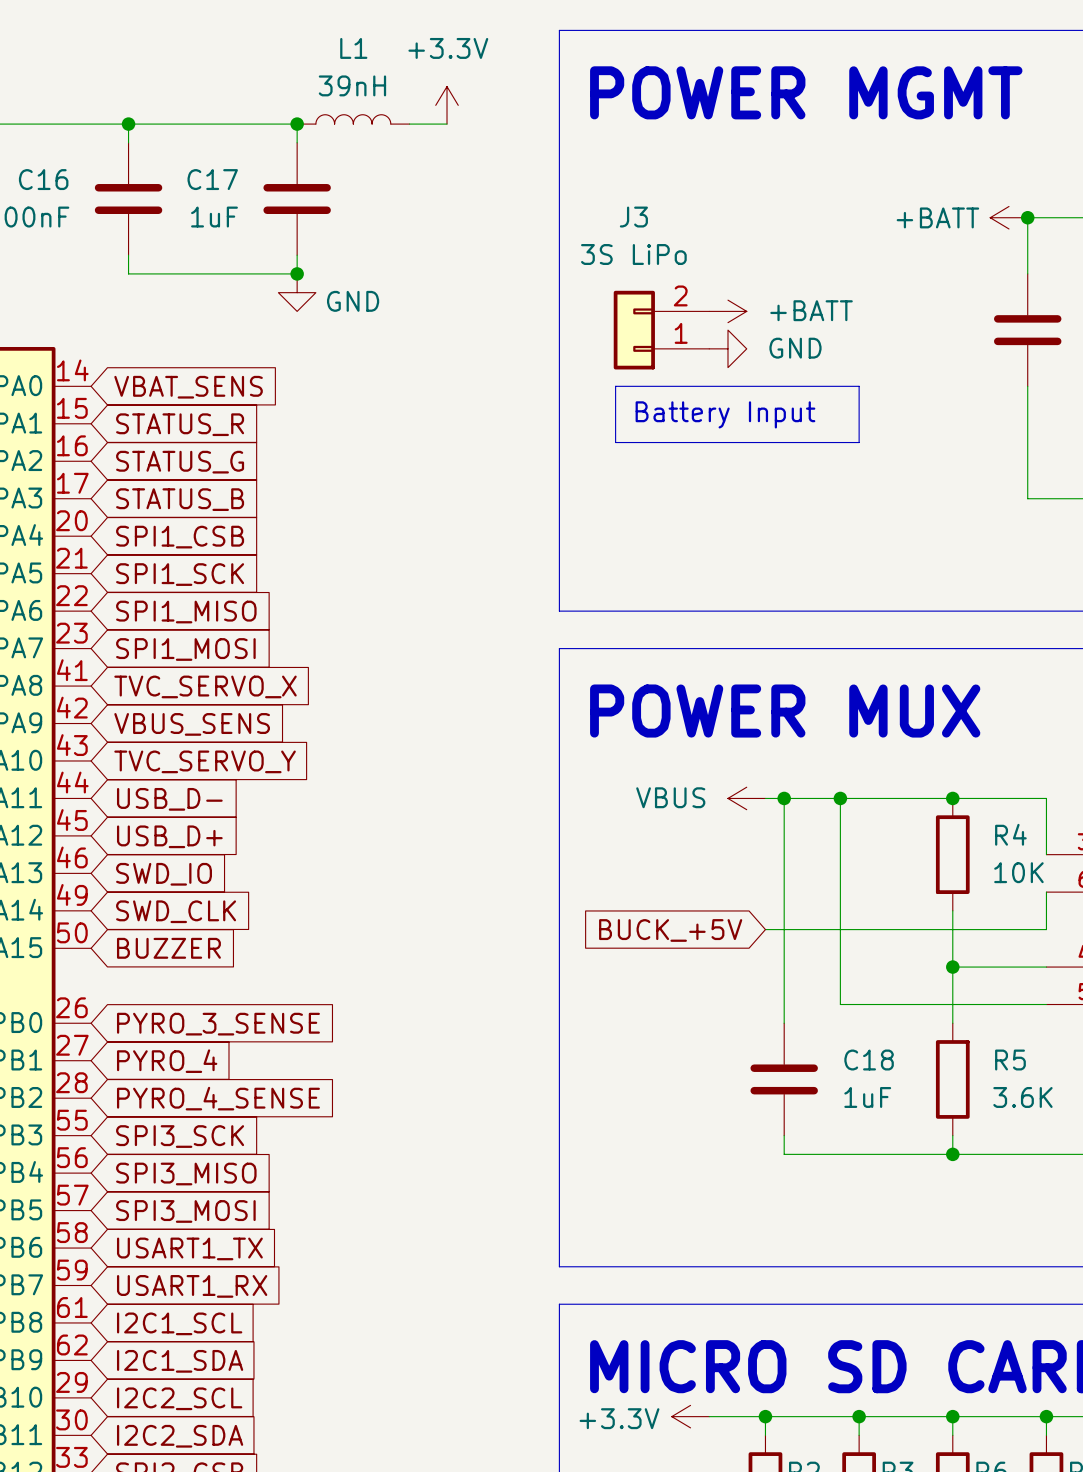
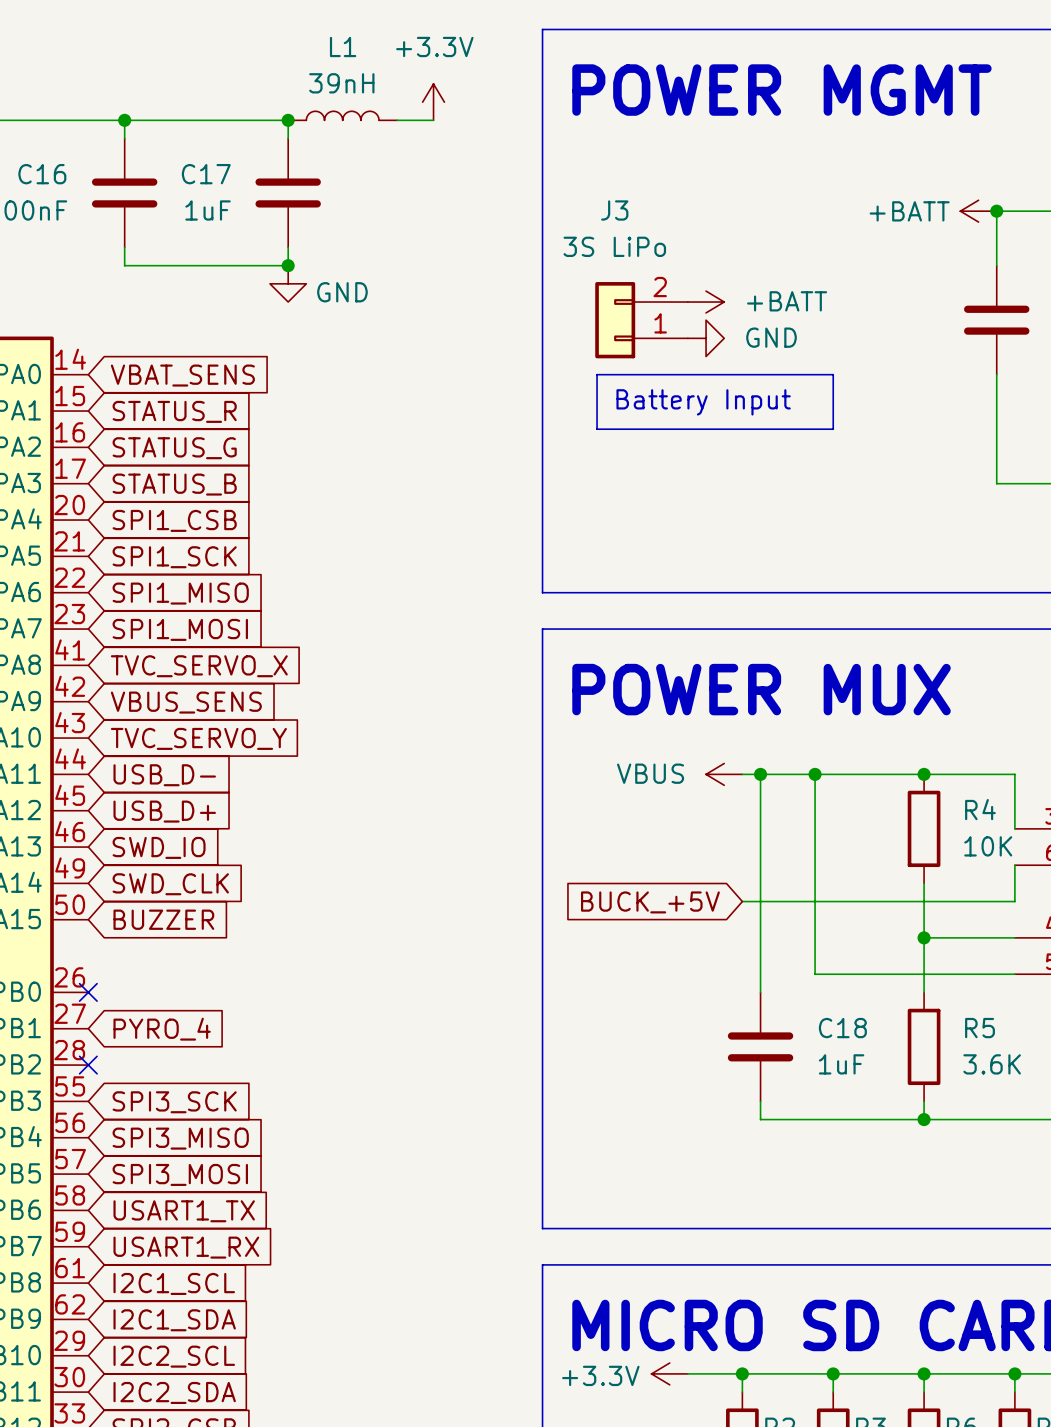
no-connect mark: none -> (88, 992)
global label: PYRO_3_SENSE (218, 1024) -> none
no-connect mark: none -> (88, 1065)
global label: PYRO_4_SENSE (218, 1098) -> none

